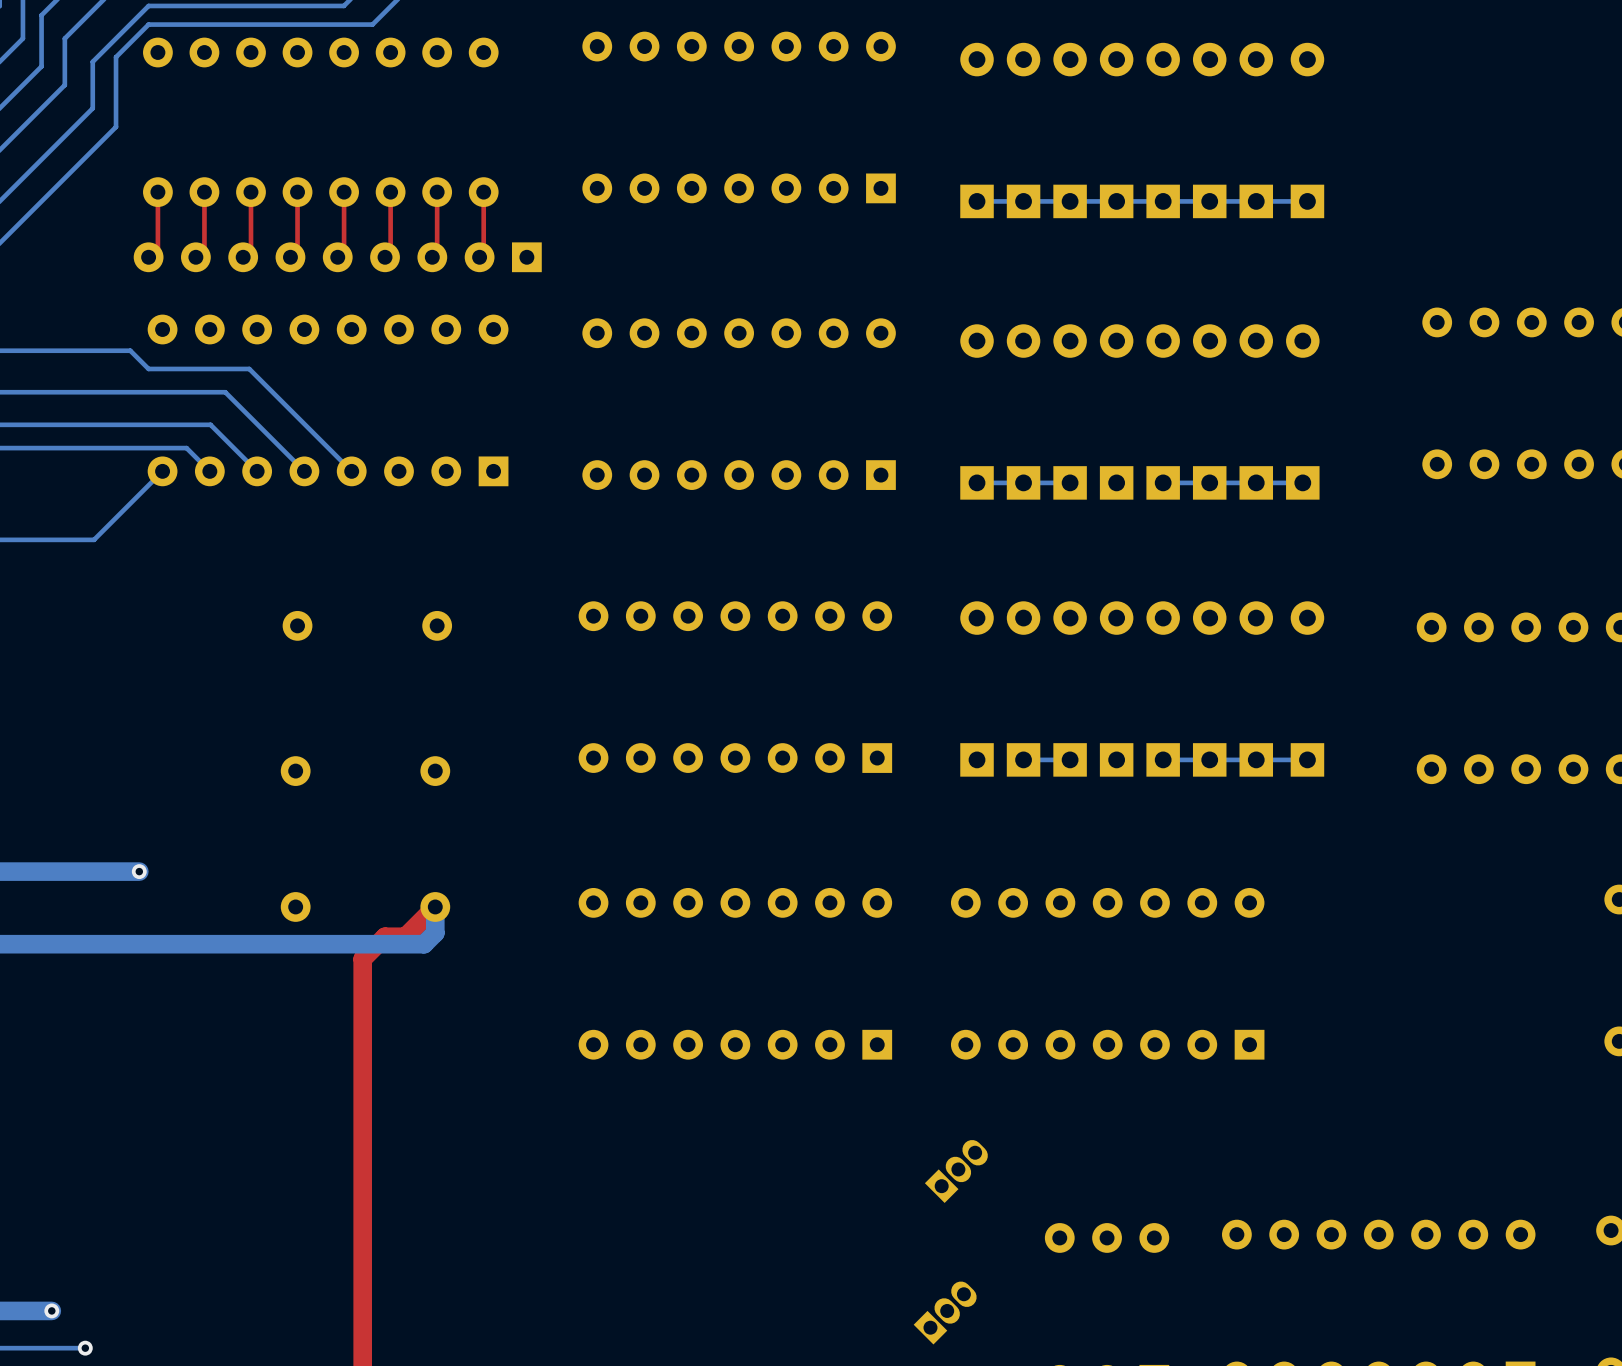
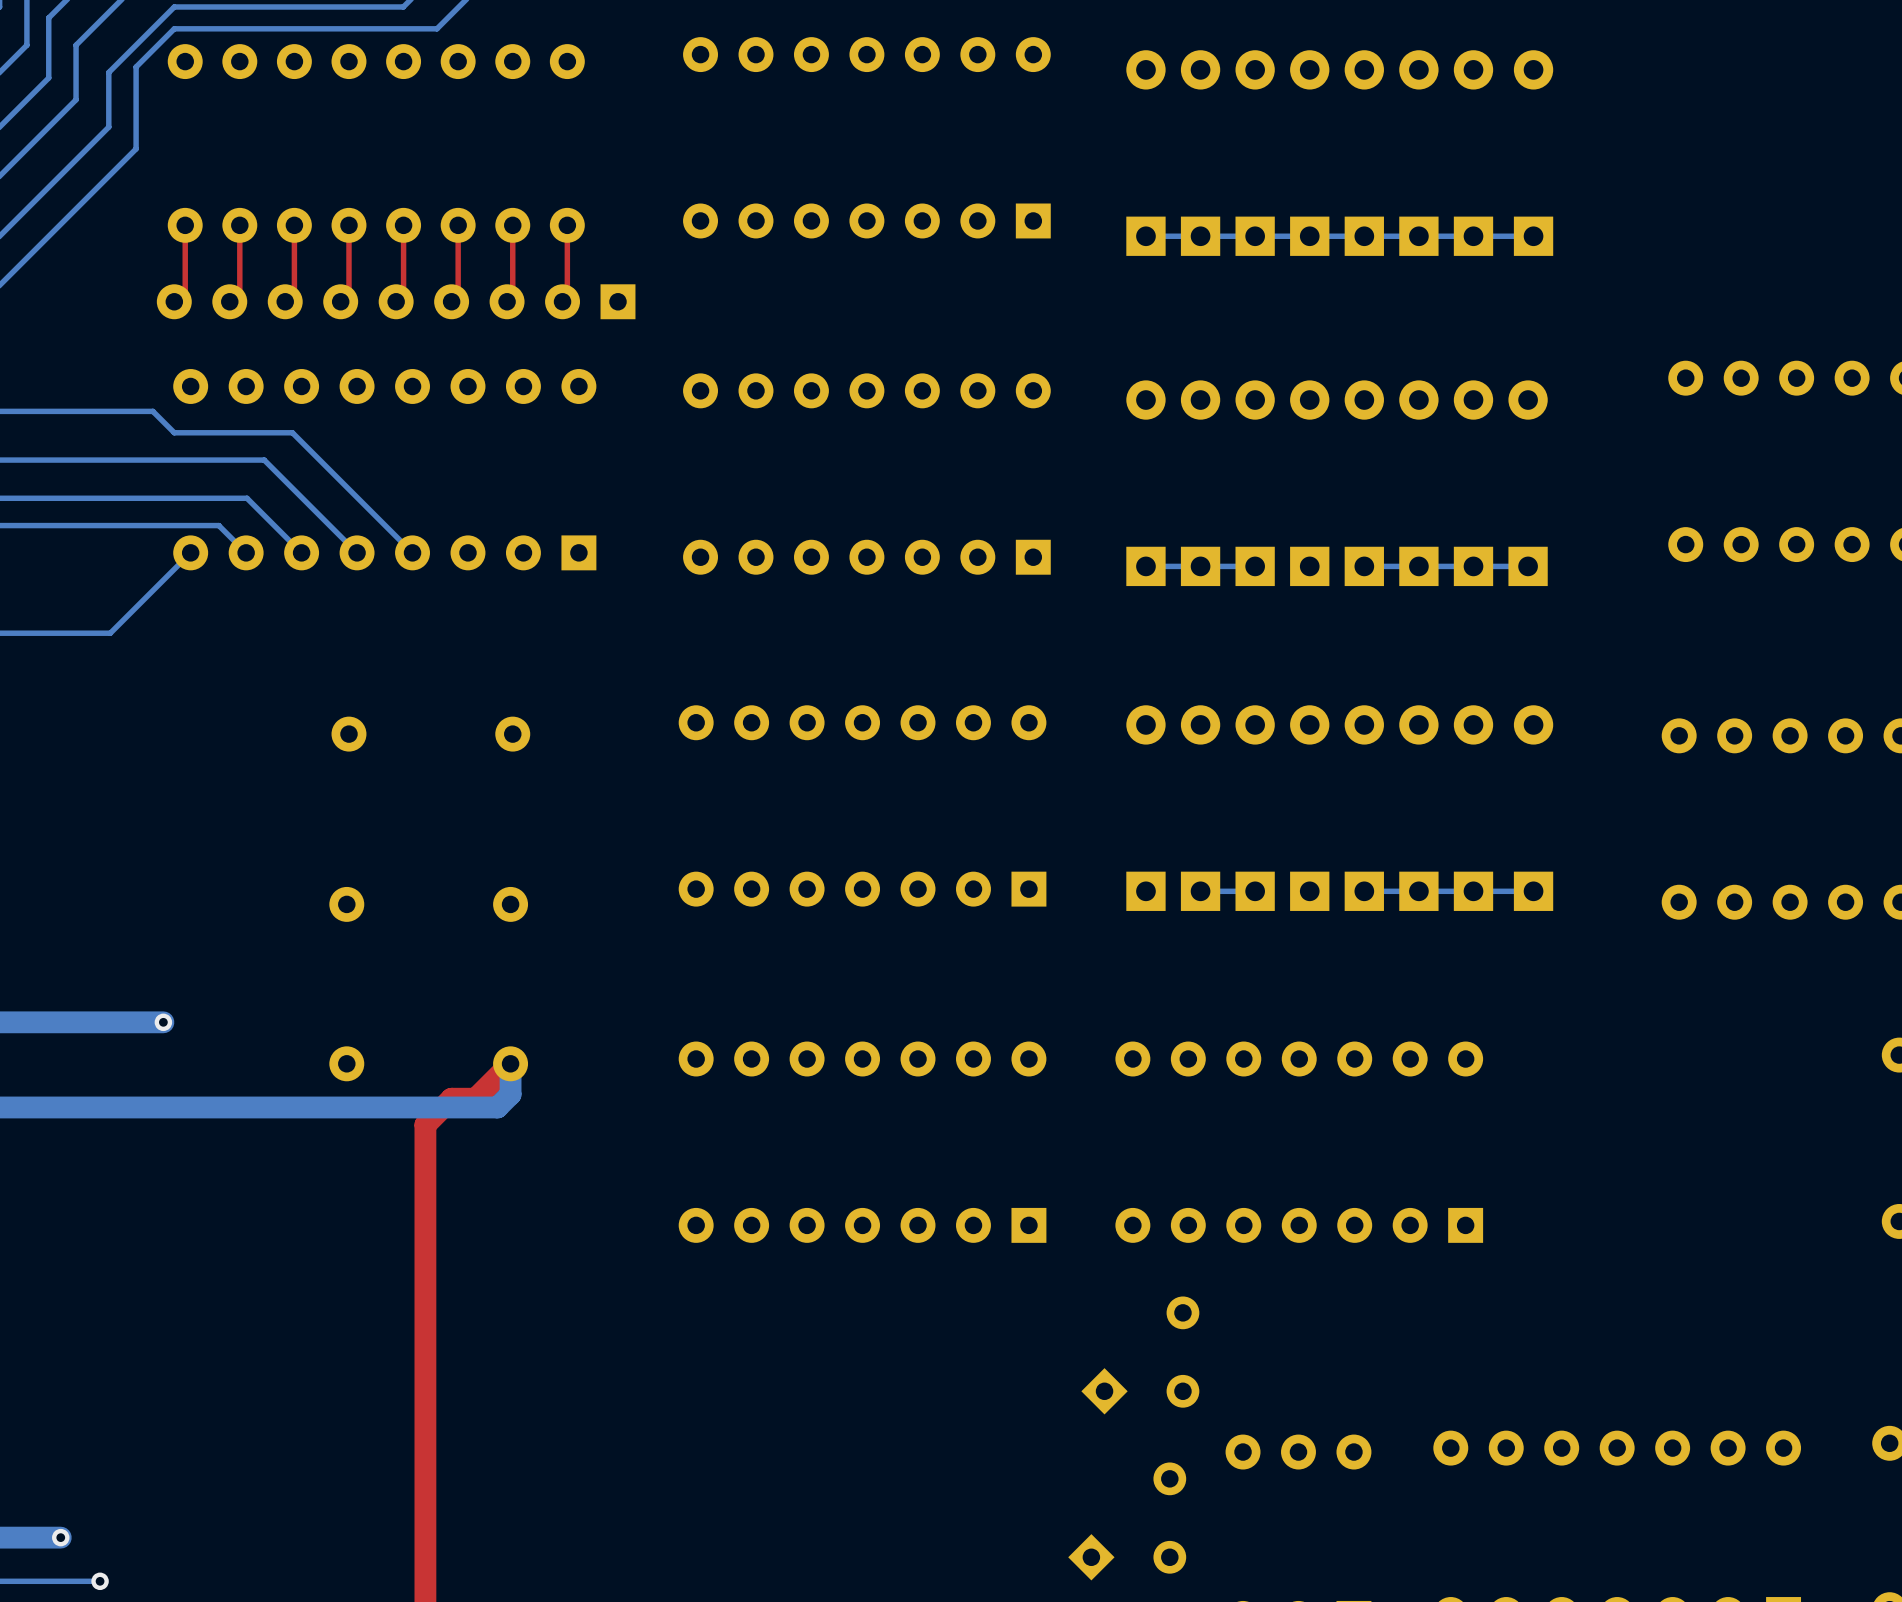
part: none -> (1140, 1355)
part: (956, 1171) -> none
part: none -> (1127, 1521)
part: (945, 1313) -> none

